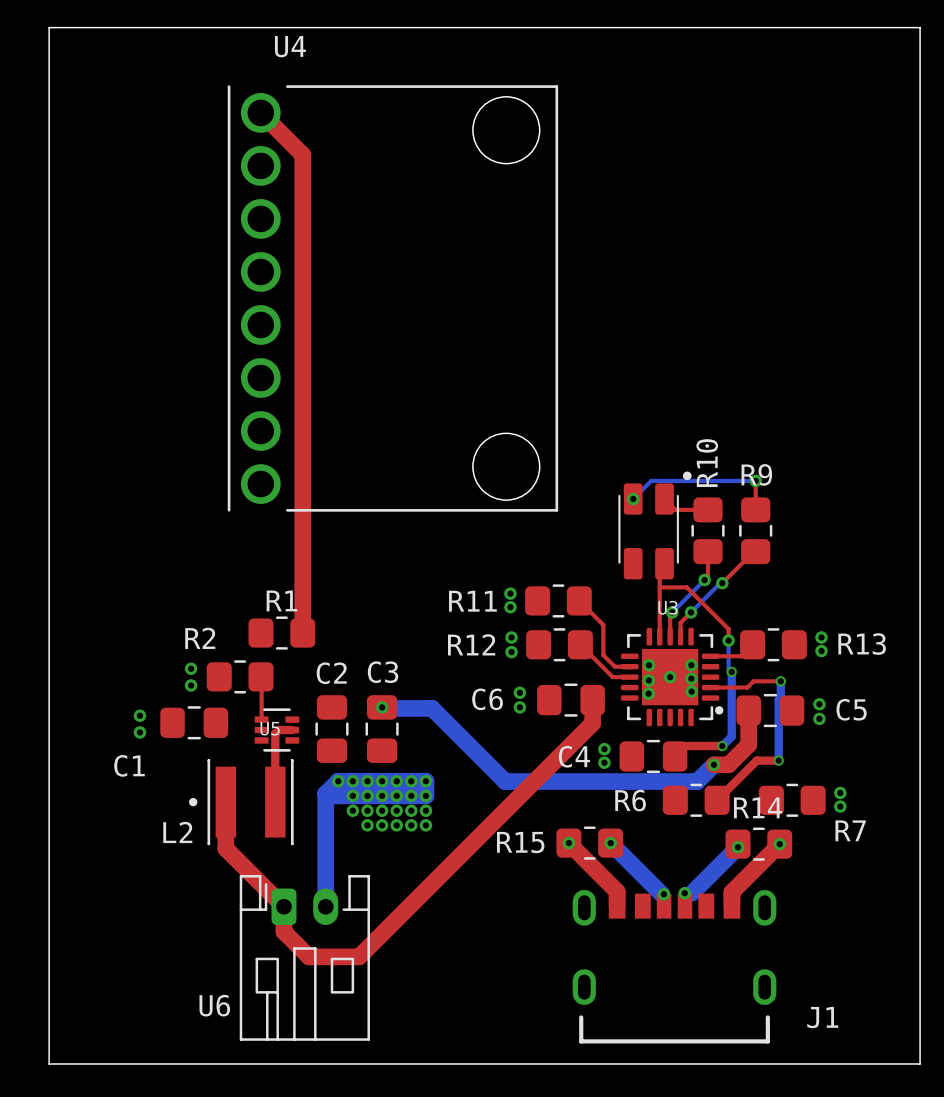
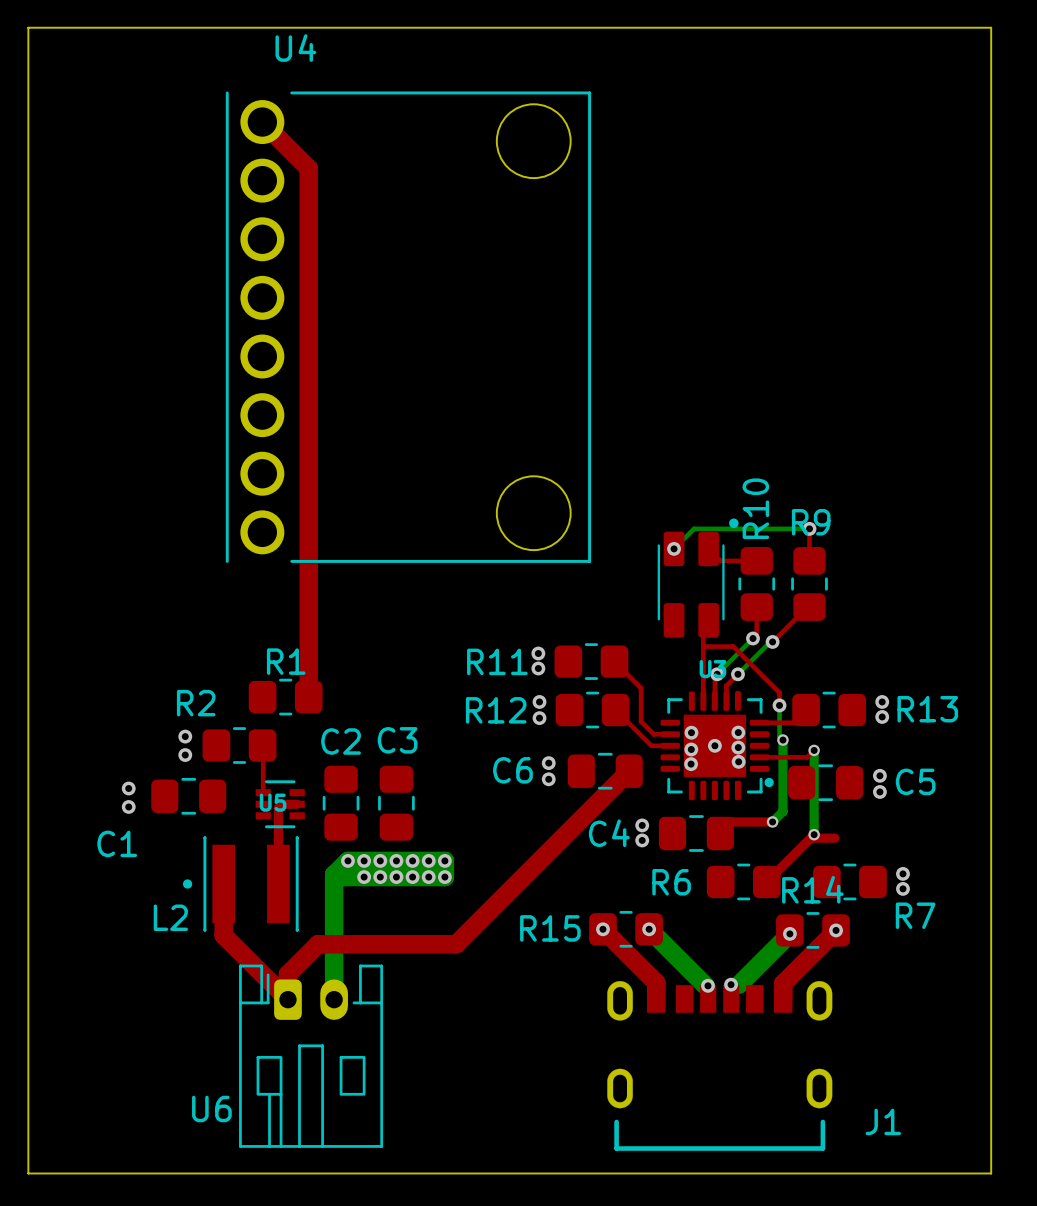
bottom track: none -> (814, 750) (814, 834)
top track: (780, 681) (753, 681) (747, 687) -> (814, 750) (807, 757) (800, 757)
bottom track: (780, 681) (780, 698) (778, 700) (778, 760) -> none
via position: (780, 681) -> (814, 750)
top track: (592, 700) (592, 723) (359, 956) (309, 956) (283, 931) (283, 906) -> (629, 771) (456, 944) (317, 944) (287, 974) (287, 999)
bottom track: (382, 707) (432, 708) (505, 781) (697, 781) (713, 764) -> none
via: (382, 707) -> none
top track: (748, 710) (748, 744) (728, 764) (713, 764) -> none
via position: (778, 760) -> (814, 834)
via: (713, 764) -> none
via: (352, 810) -> none
via: (367, 810) -> none
via: (382, 810) -> none
via: (396, 810) -> none
via: (411, 810) -> none
via: (425, 810) -> none
via: (367, 825) -> none
via: (382, 825) -> none
via: (396, 825) -> none
via: (411, 825) -> none
via: (425, 825) -> none

